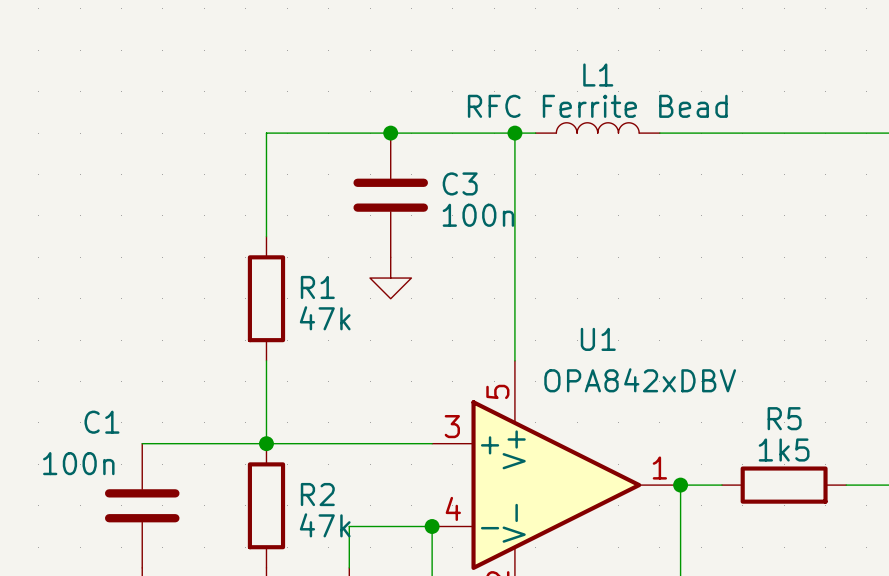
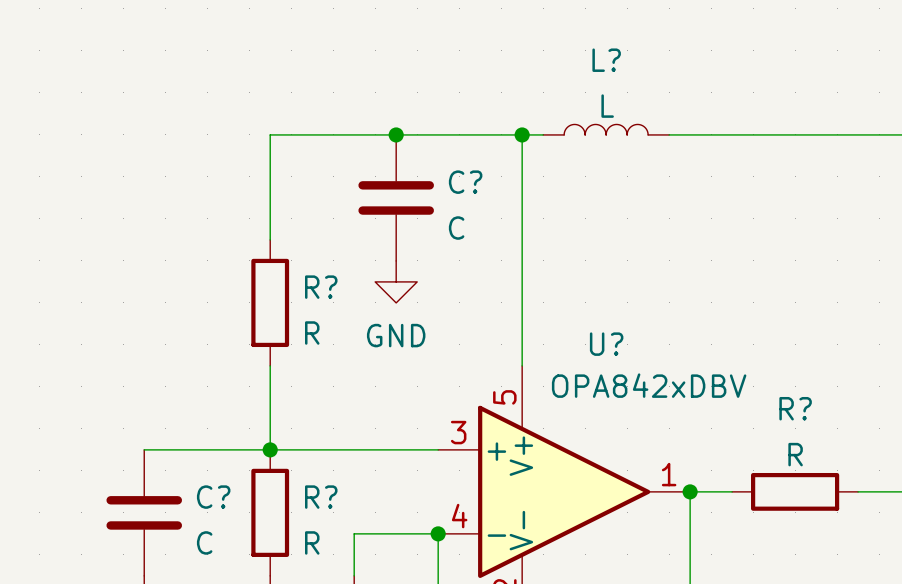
L1: RFC Ferrite Bead (597, 127) -> none
L?: none -> L (606, 129)
C3 name: C3 (460, 183) -> C? (465, 182)
C3 value: 100n (478, 215) -> C (456, 228)
R1 name: R1 (317, 287) -> R? (321, 287)
R1 value: 47k (325, 318) -> R (312, 333)
power symbol text: none -> GND (396, 335)
U1 name: U1 (598, 339) -> U? (606, 344)
R5 name: R5 (784, 418) -> R? (795, 408)
C1 name: C1 (101, 422) -> C? (213, 497)
R5 value: 1k5 (784, 450) -> R (795, 454)
C1 value: 100n (78, 463) -> C (204, 542)
R2 name: R2 (317, 494) -> R? (321, 497)
R2 value: 47k (325, 525) -> R (312, 542)

